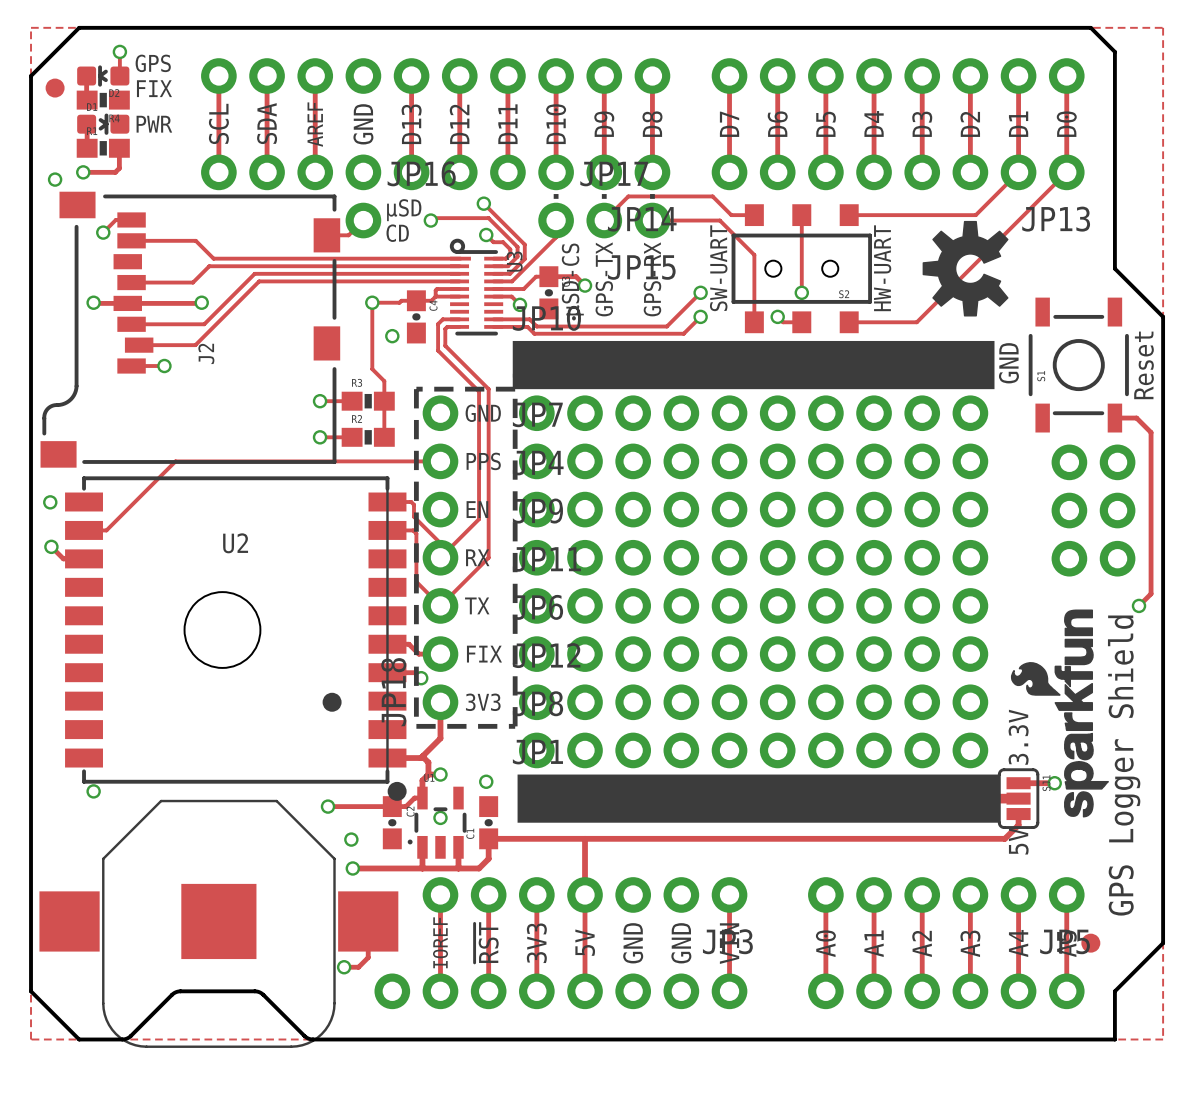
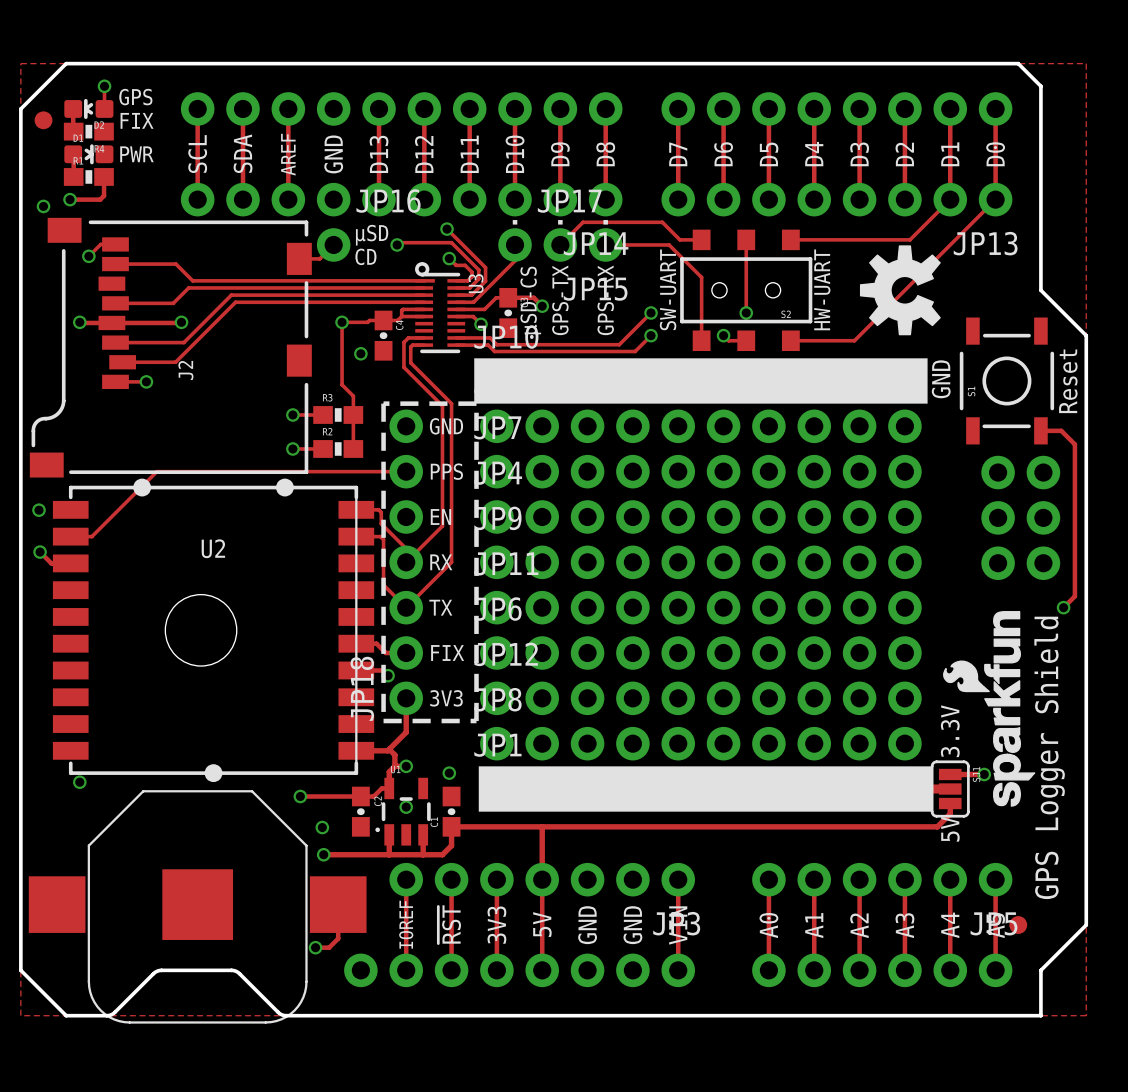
U2 footprint: [65, 476, 407, 801] -> [52, 478, 375, 783]

